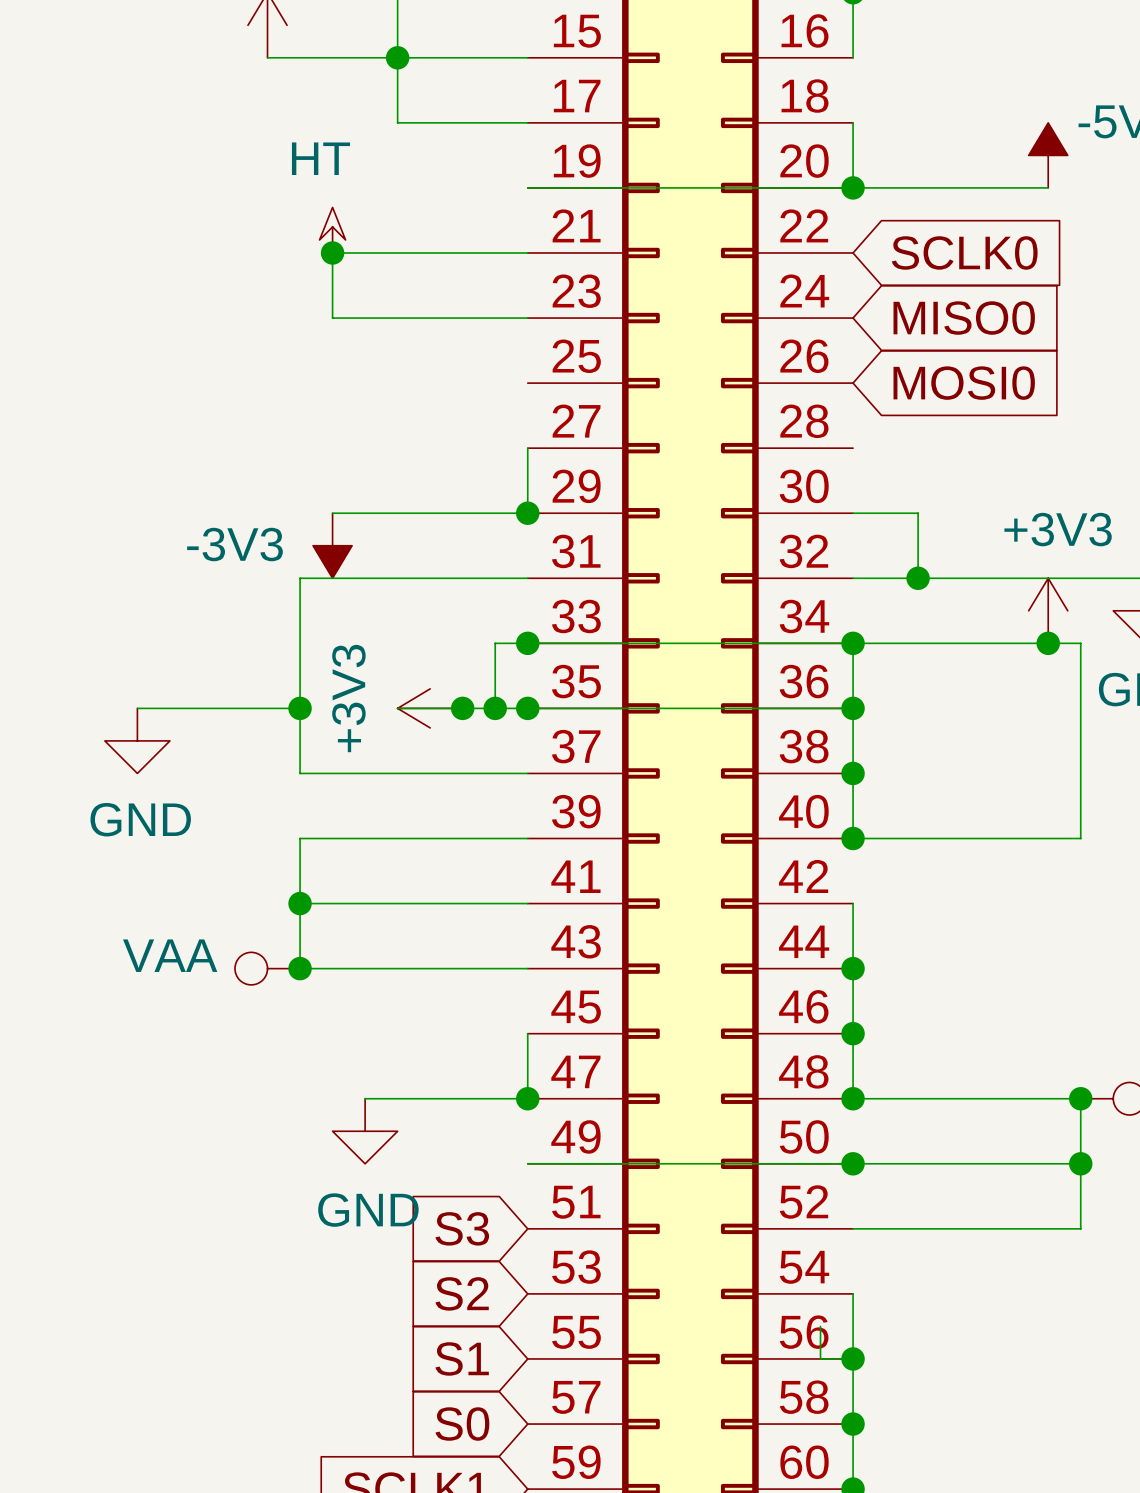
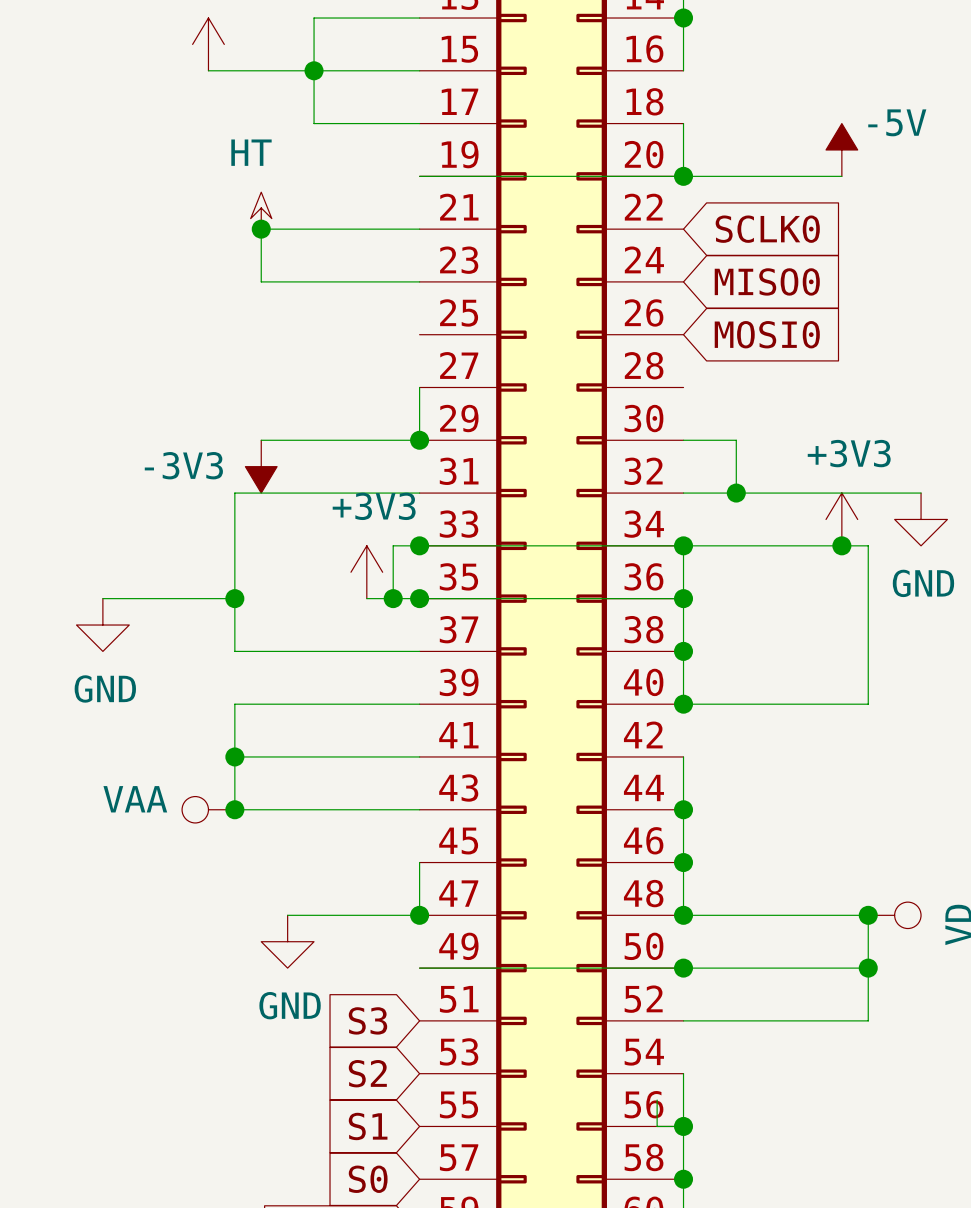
wire: (397, 708) (462, 708) -> none
power symbol rotation: 0° (430, 708) -> 90° clockwise (366, 572)
power symbol position: +3V3 (430, 708) -> +3V3 (366, 572)
junction: (462, 708) -> none

